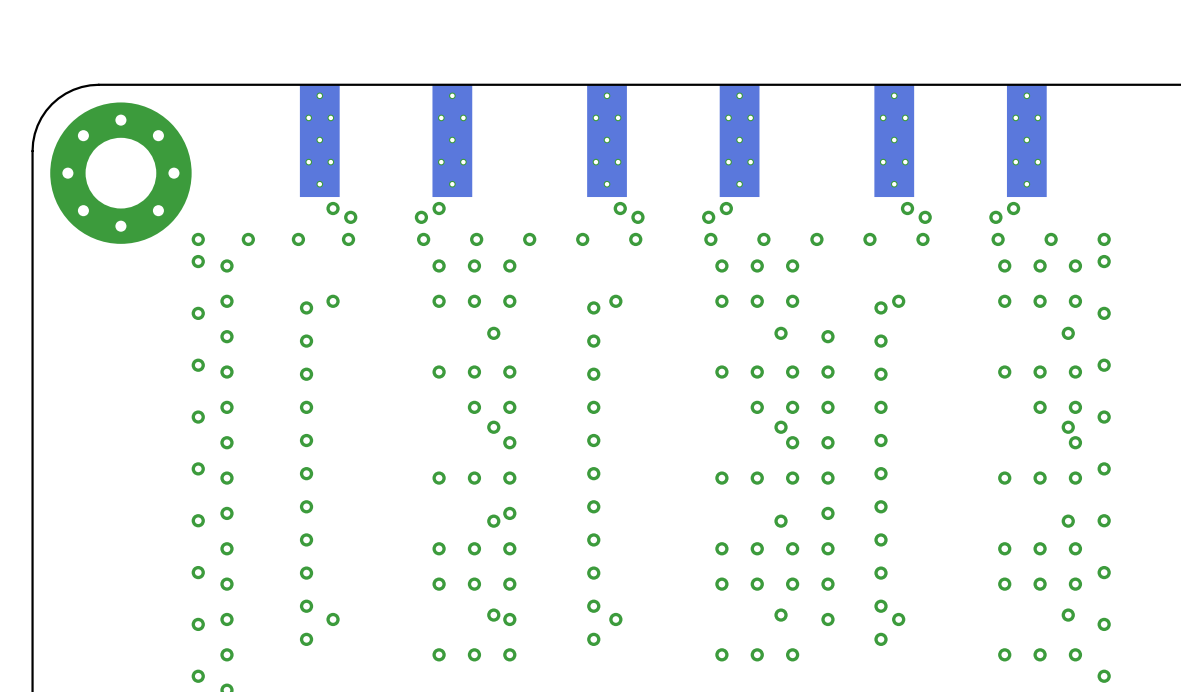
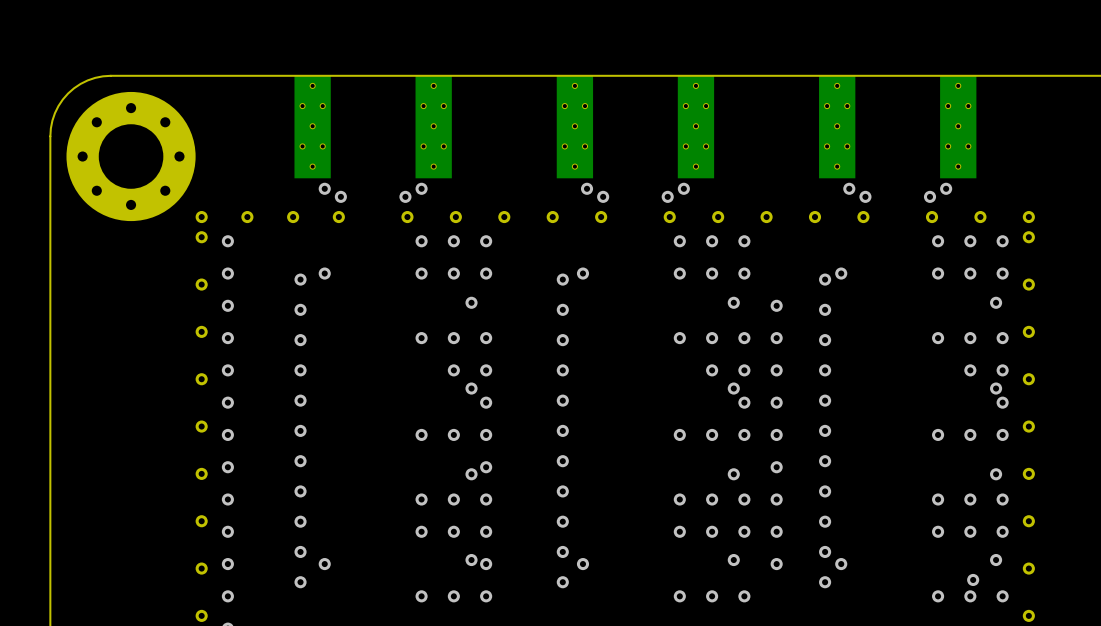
via: none -> (973, 579)

